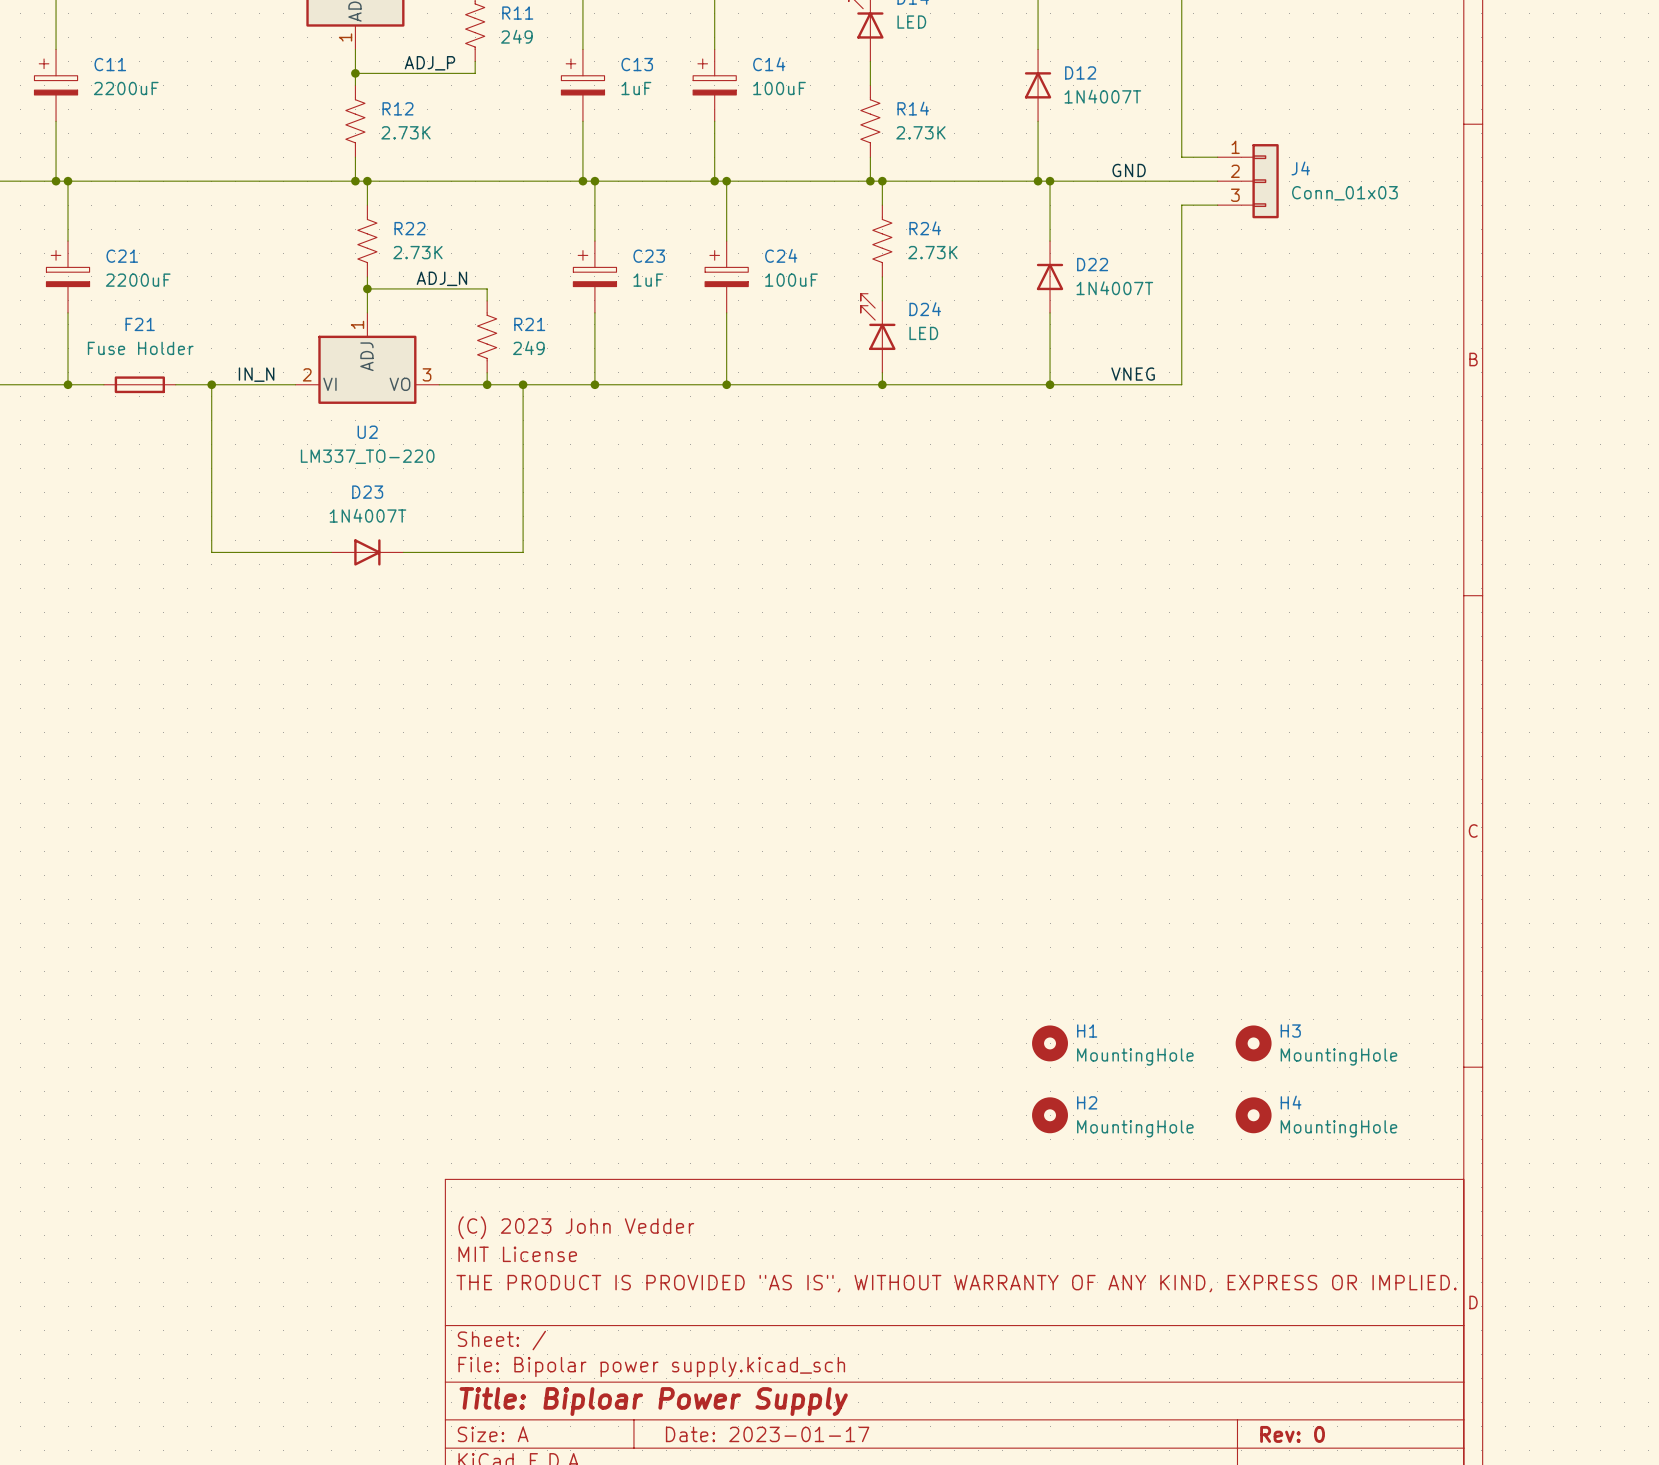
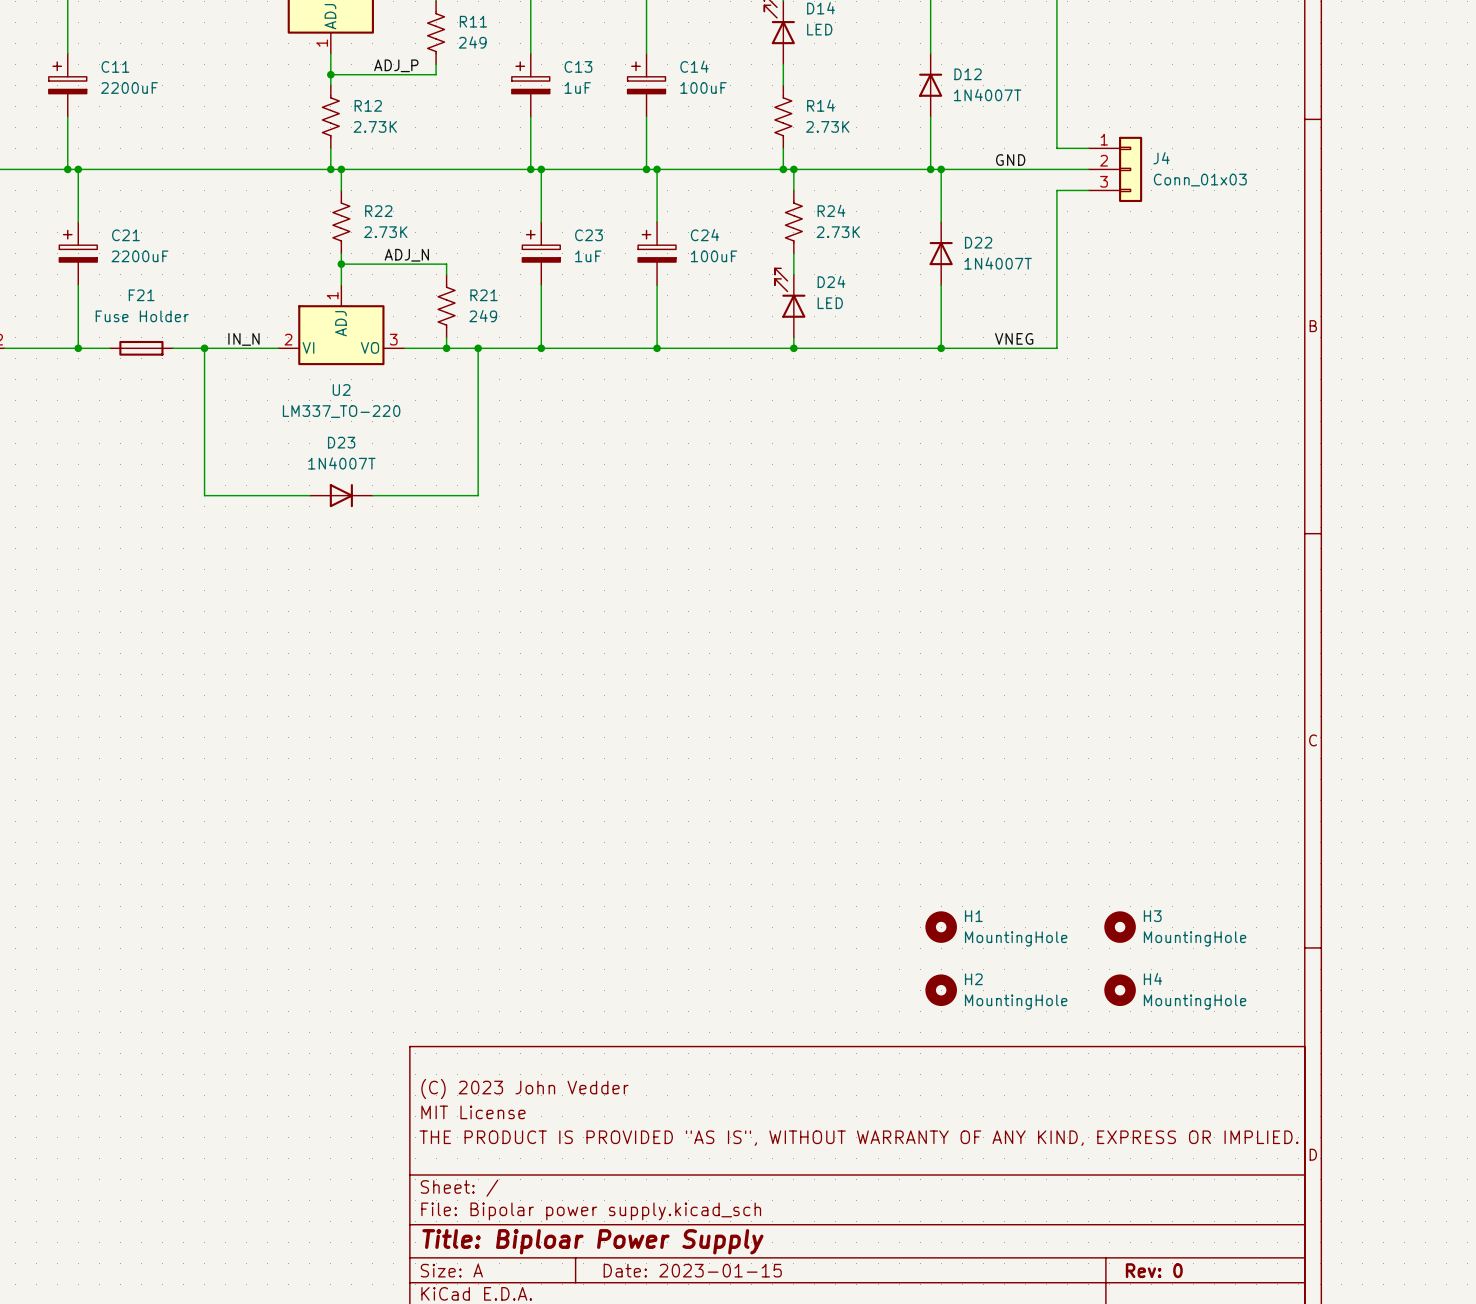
title block: Date: 2023-01-17 (767, 1434) -> Date: 2023-01-15 (692, 1270)

